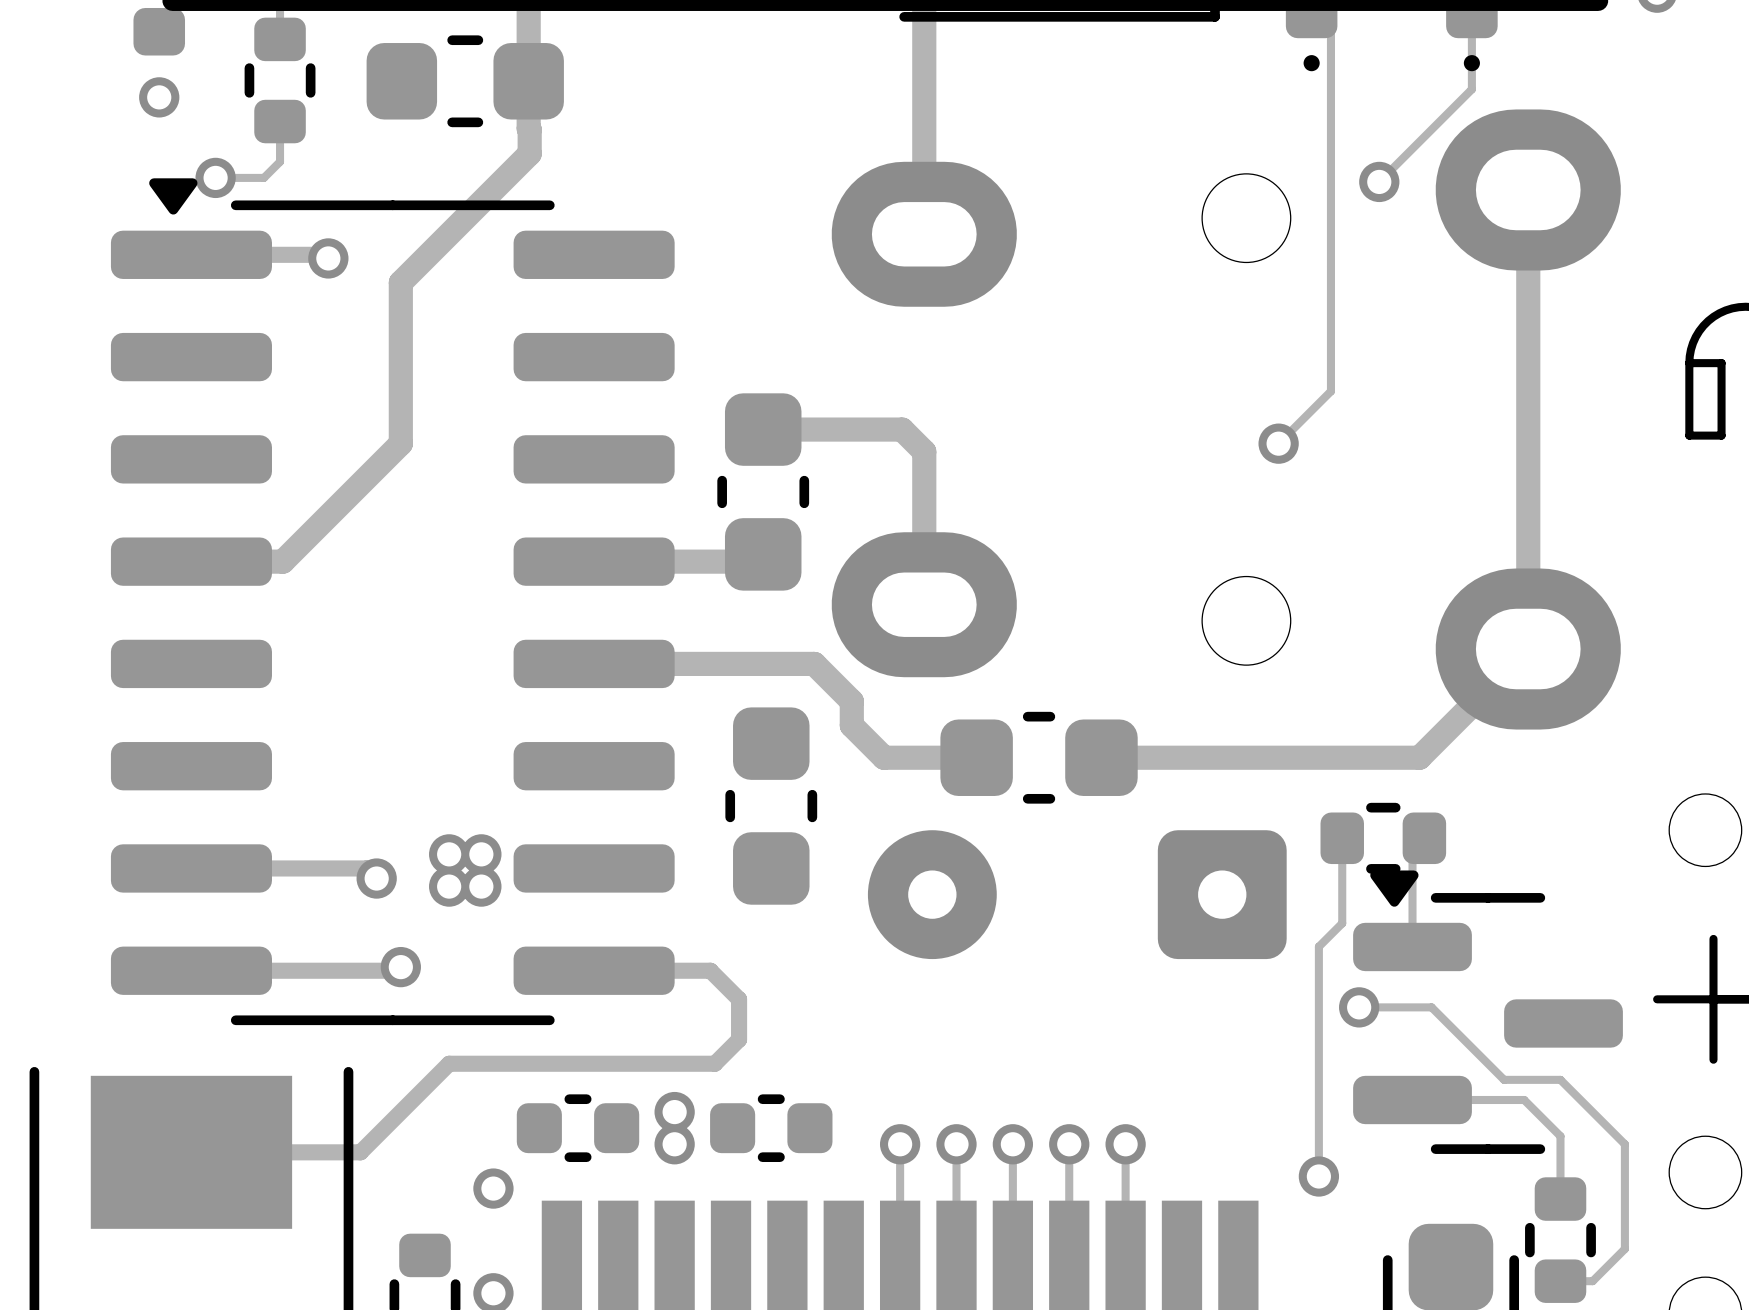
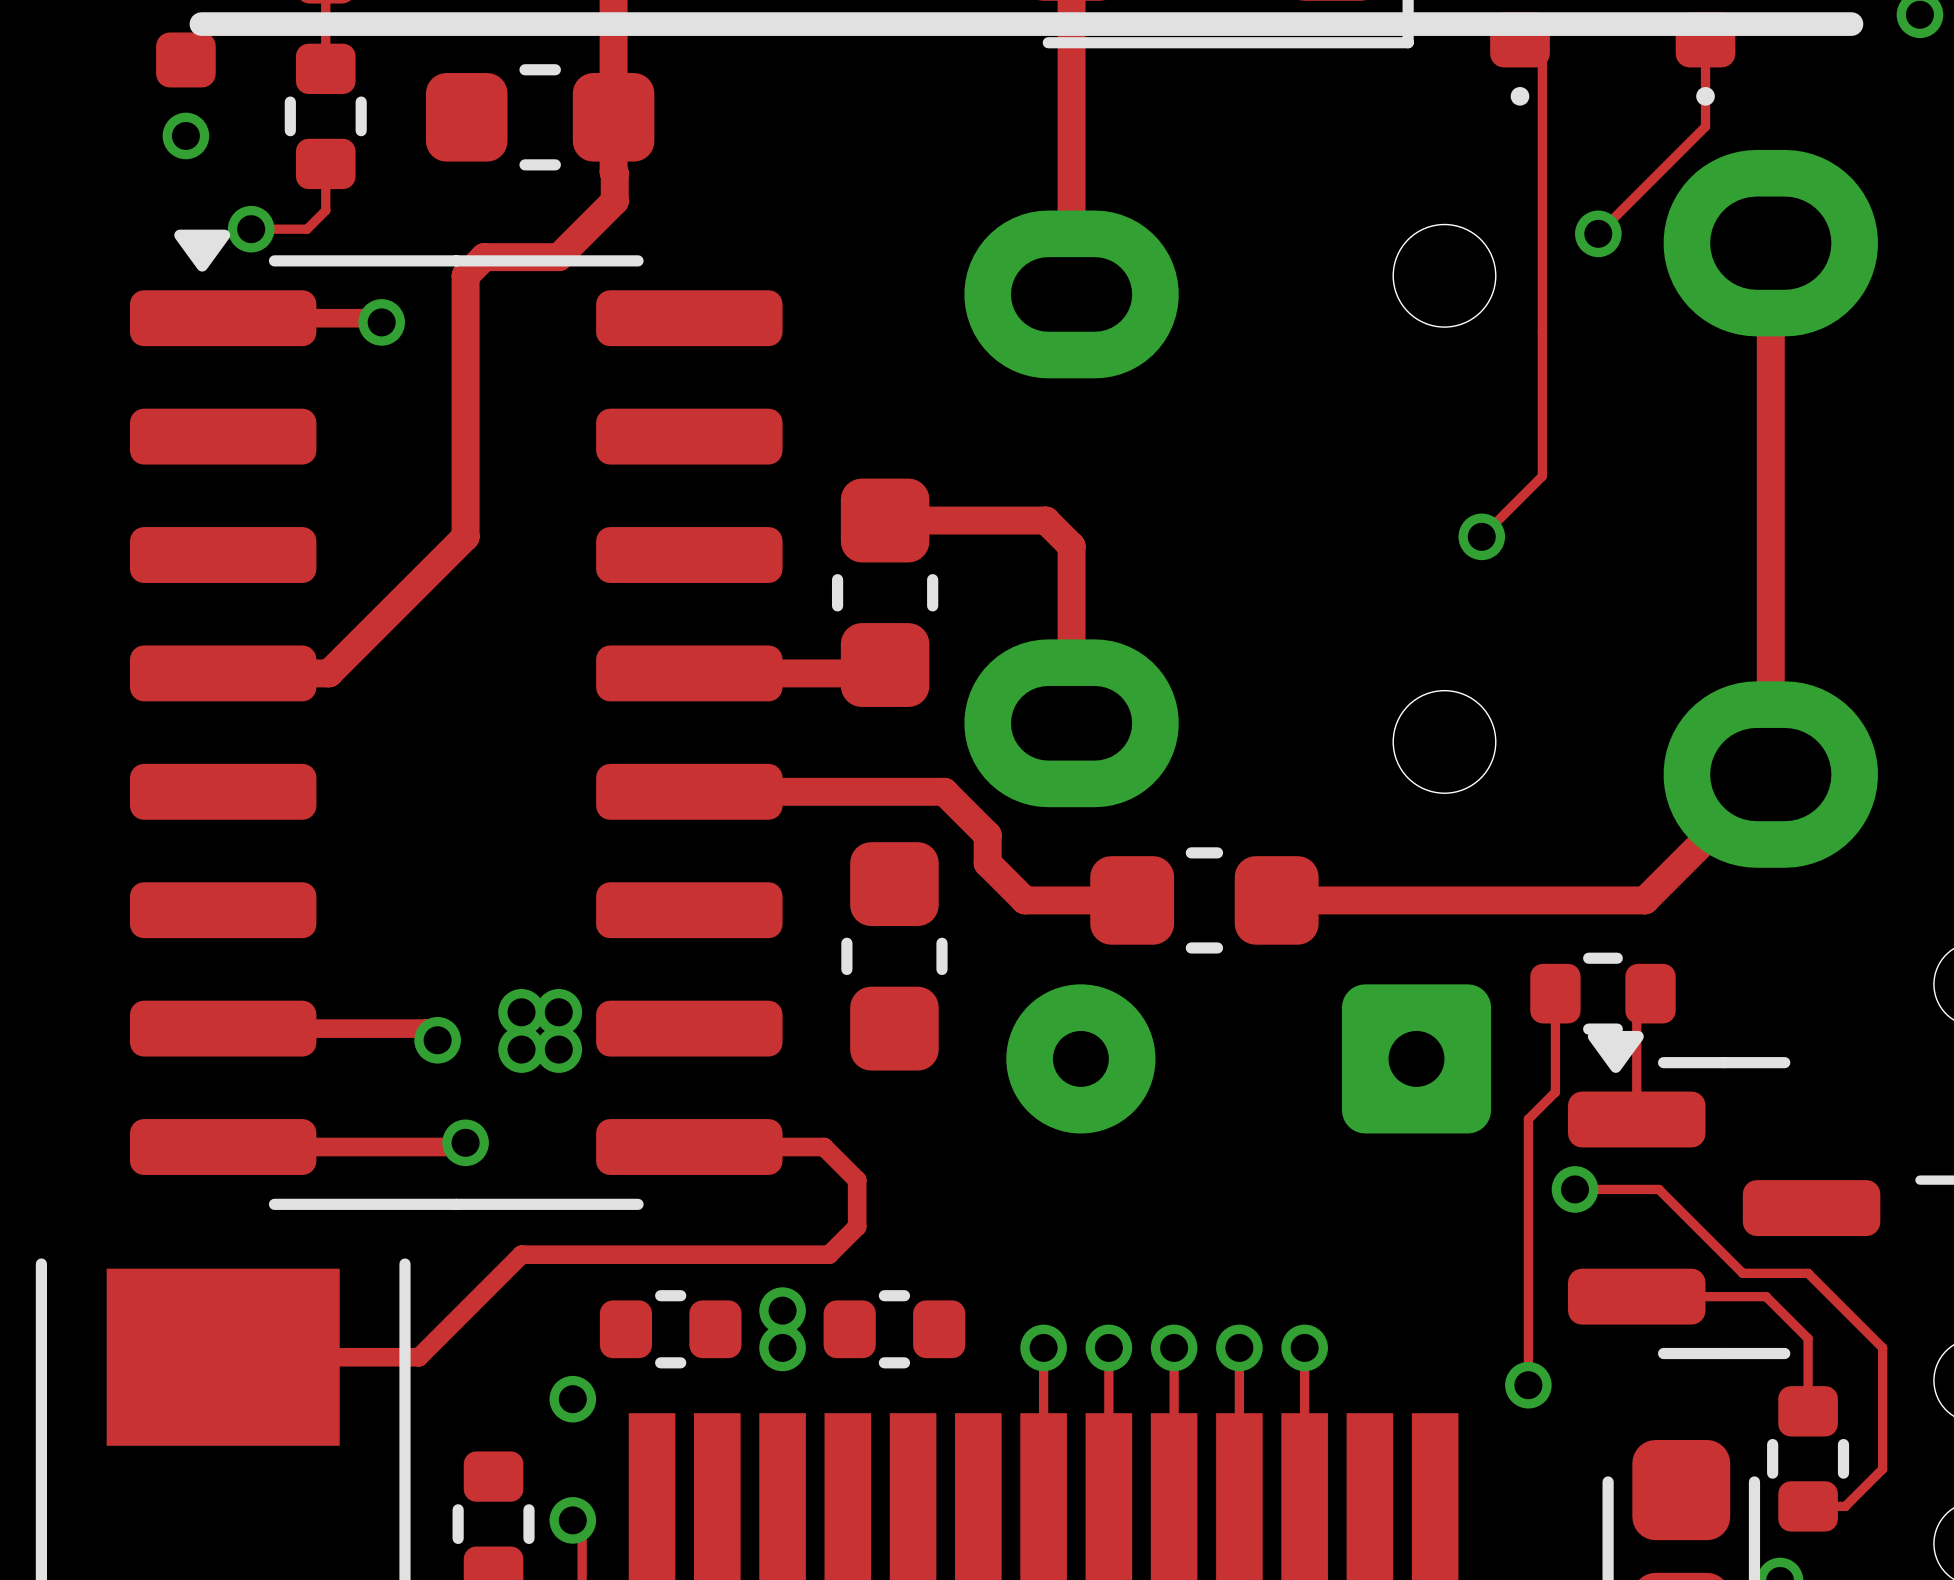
track: (481, 202) (400, 282) -> (558, 257) (484, 257) (465, 275) (465, 350)

